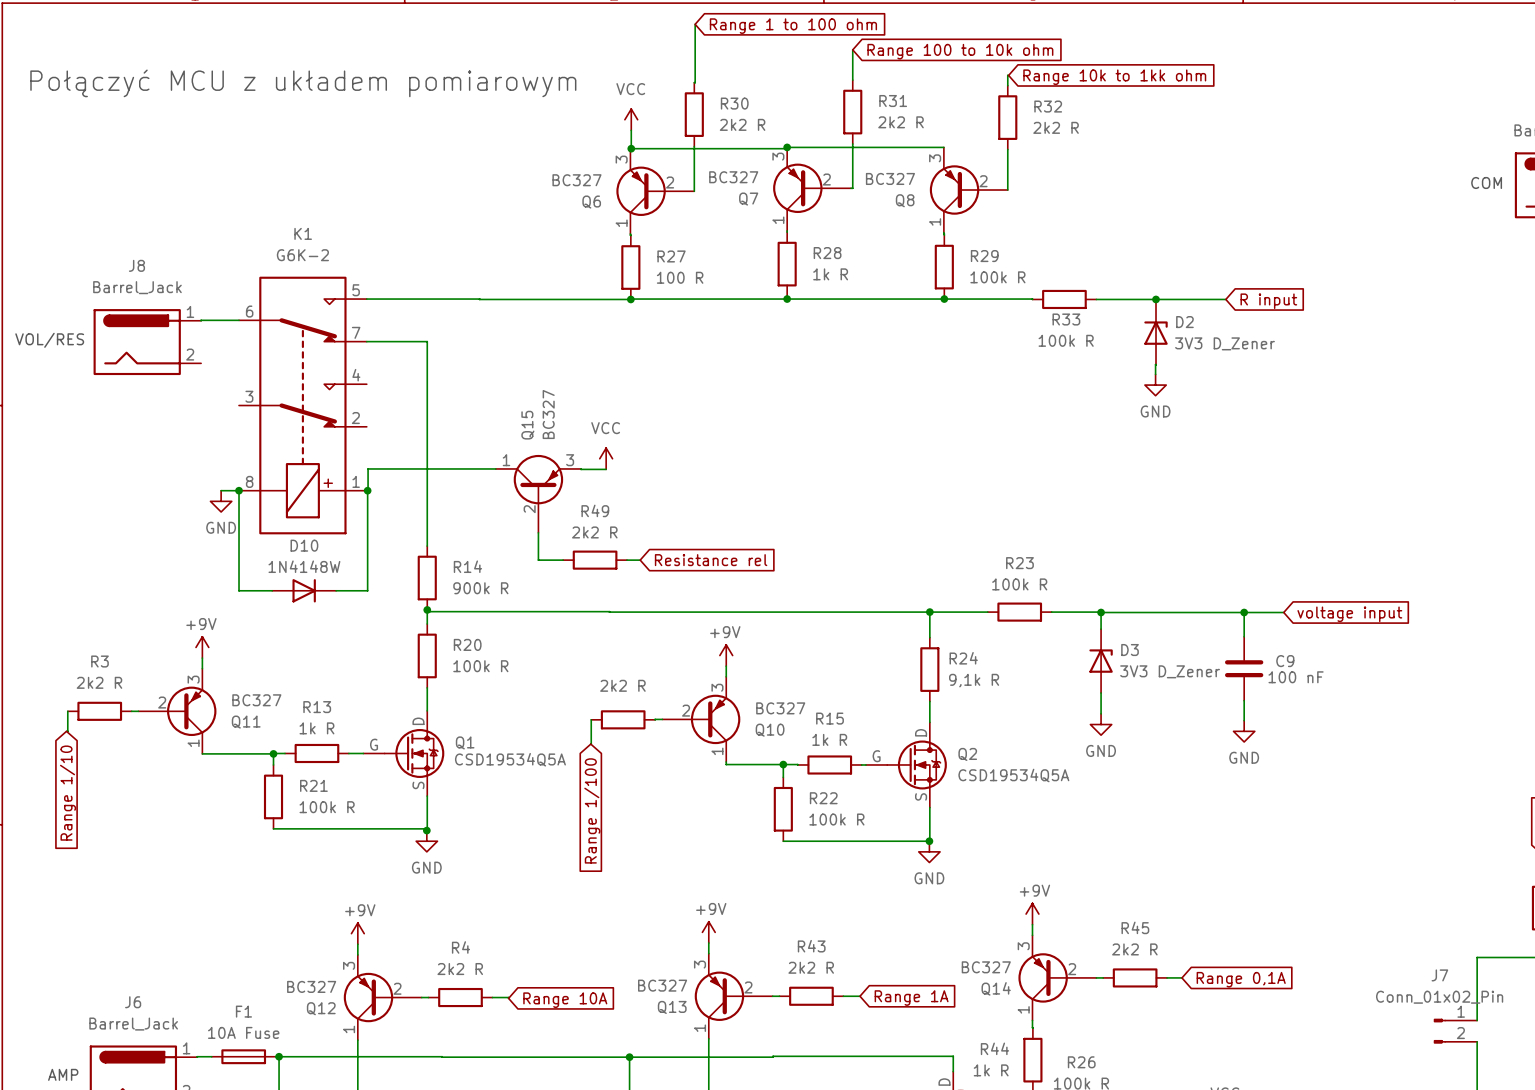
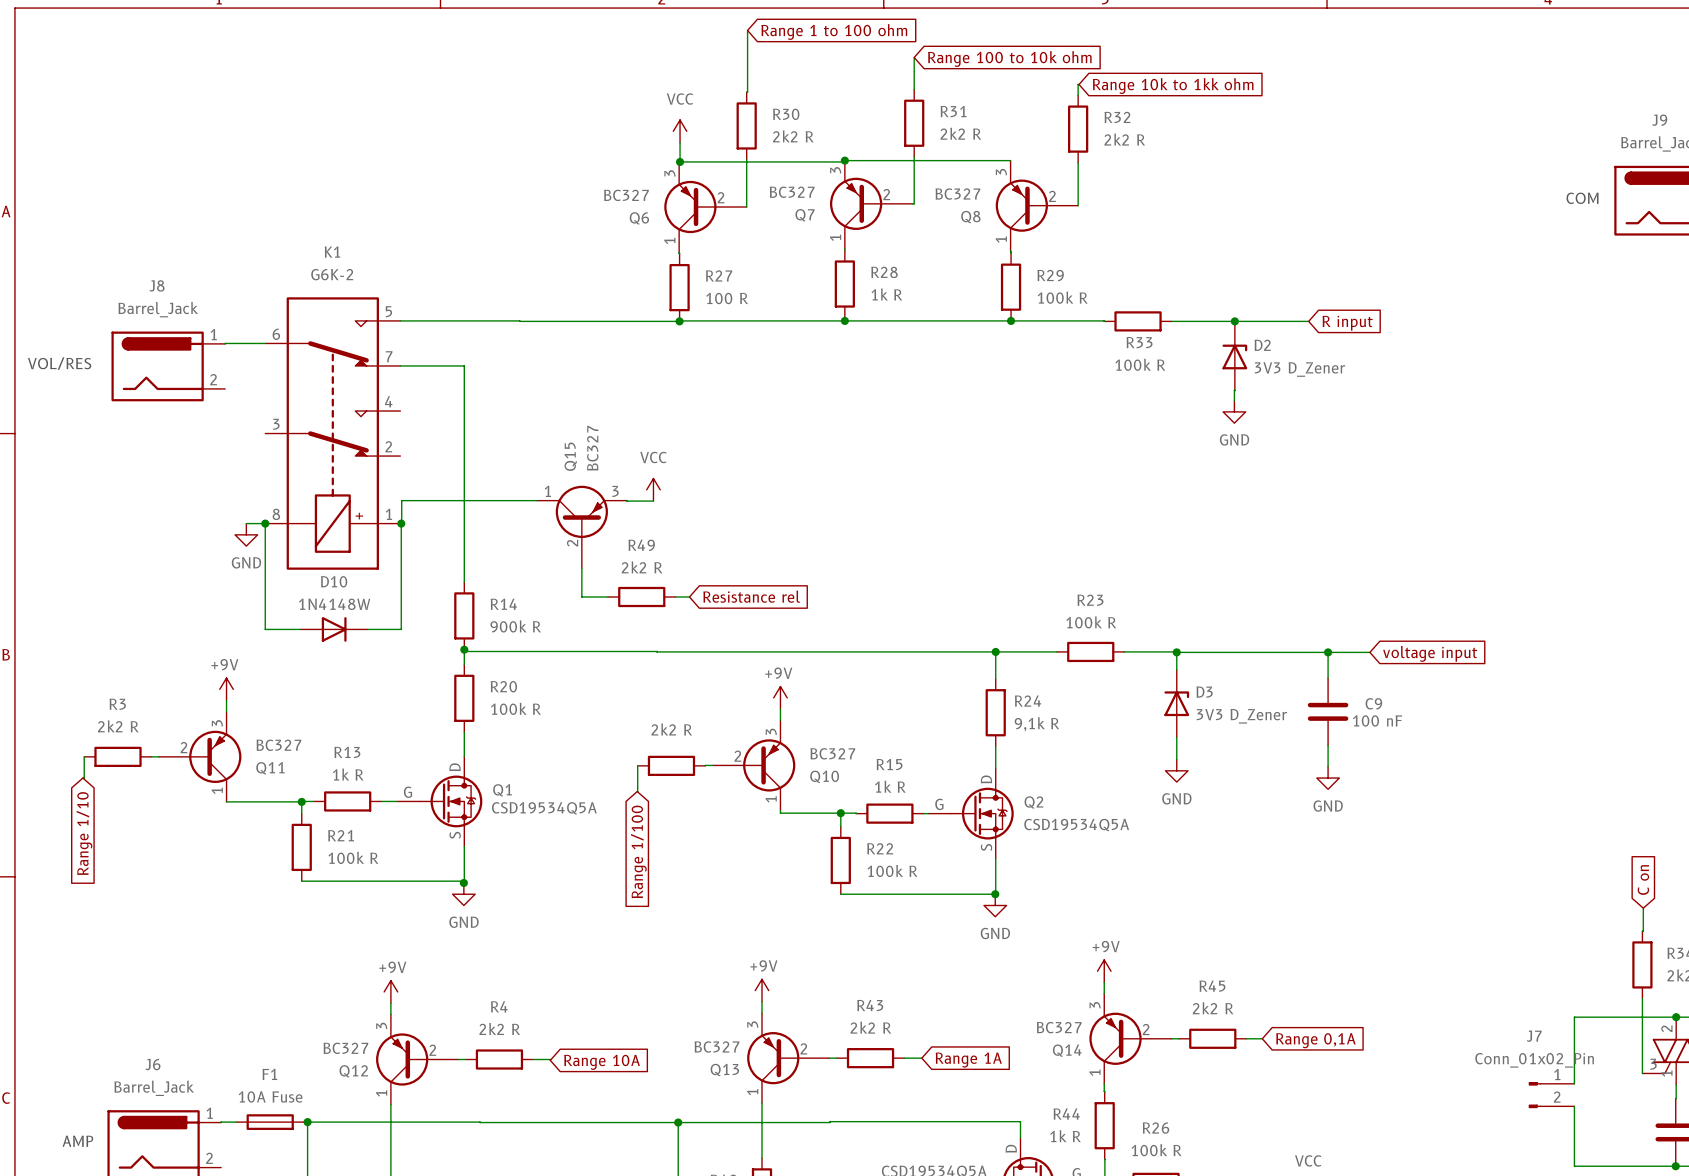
text: Połączyć MCU z układem pomiarowym (303, 83) -> none

